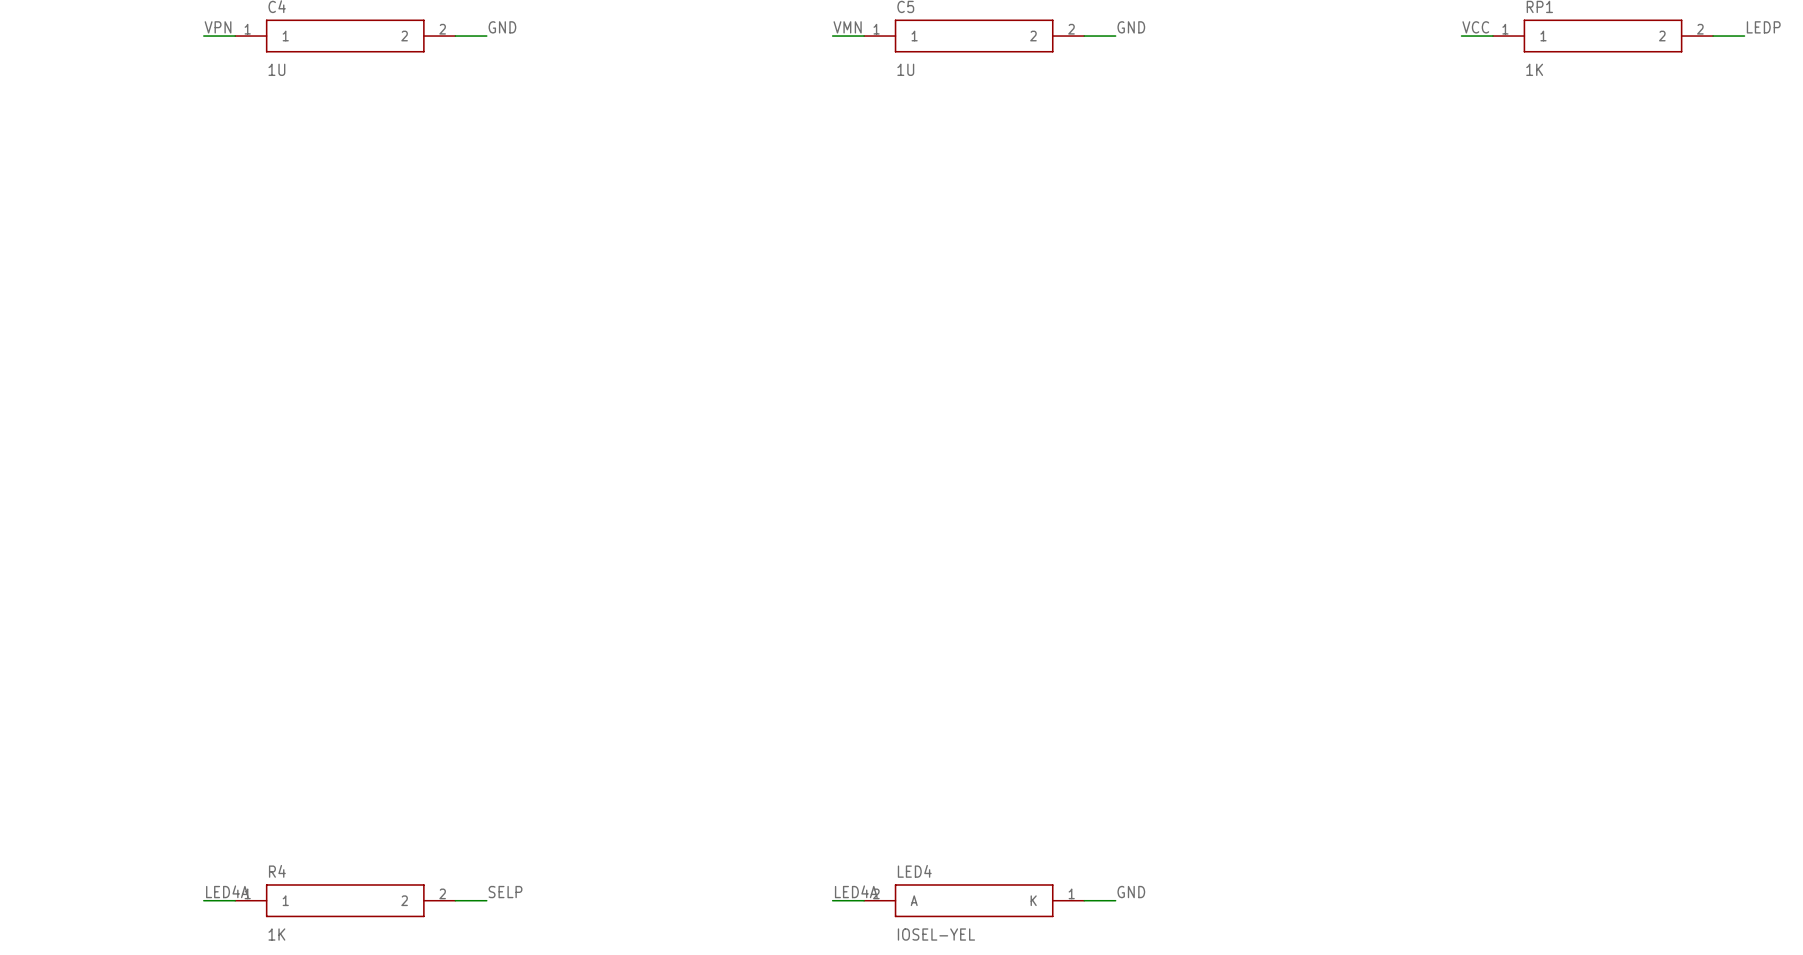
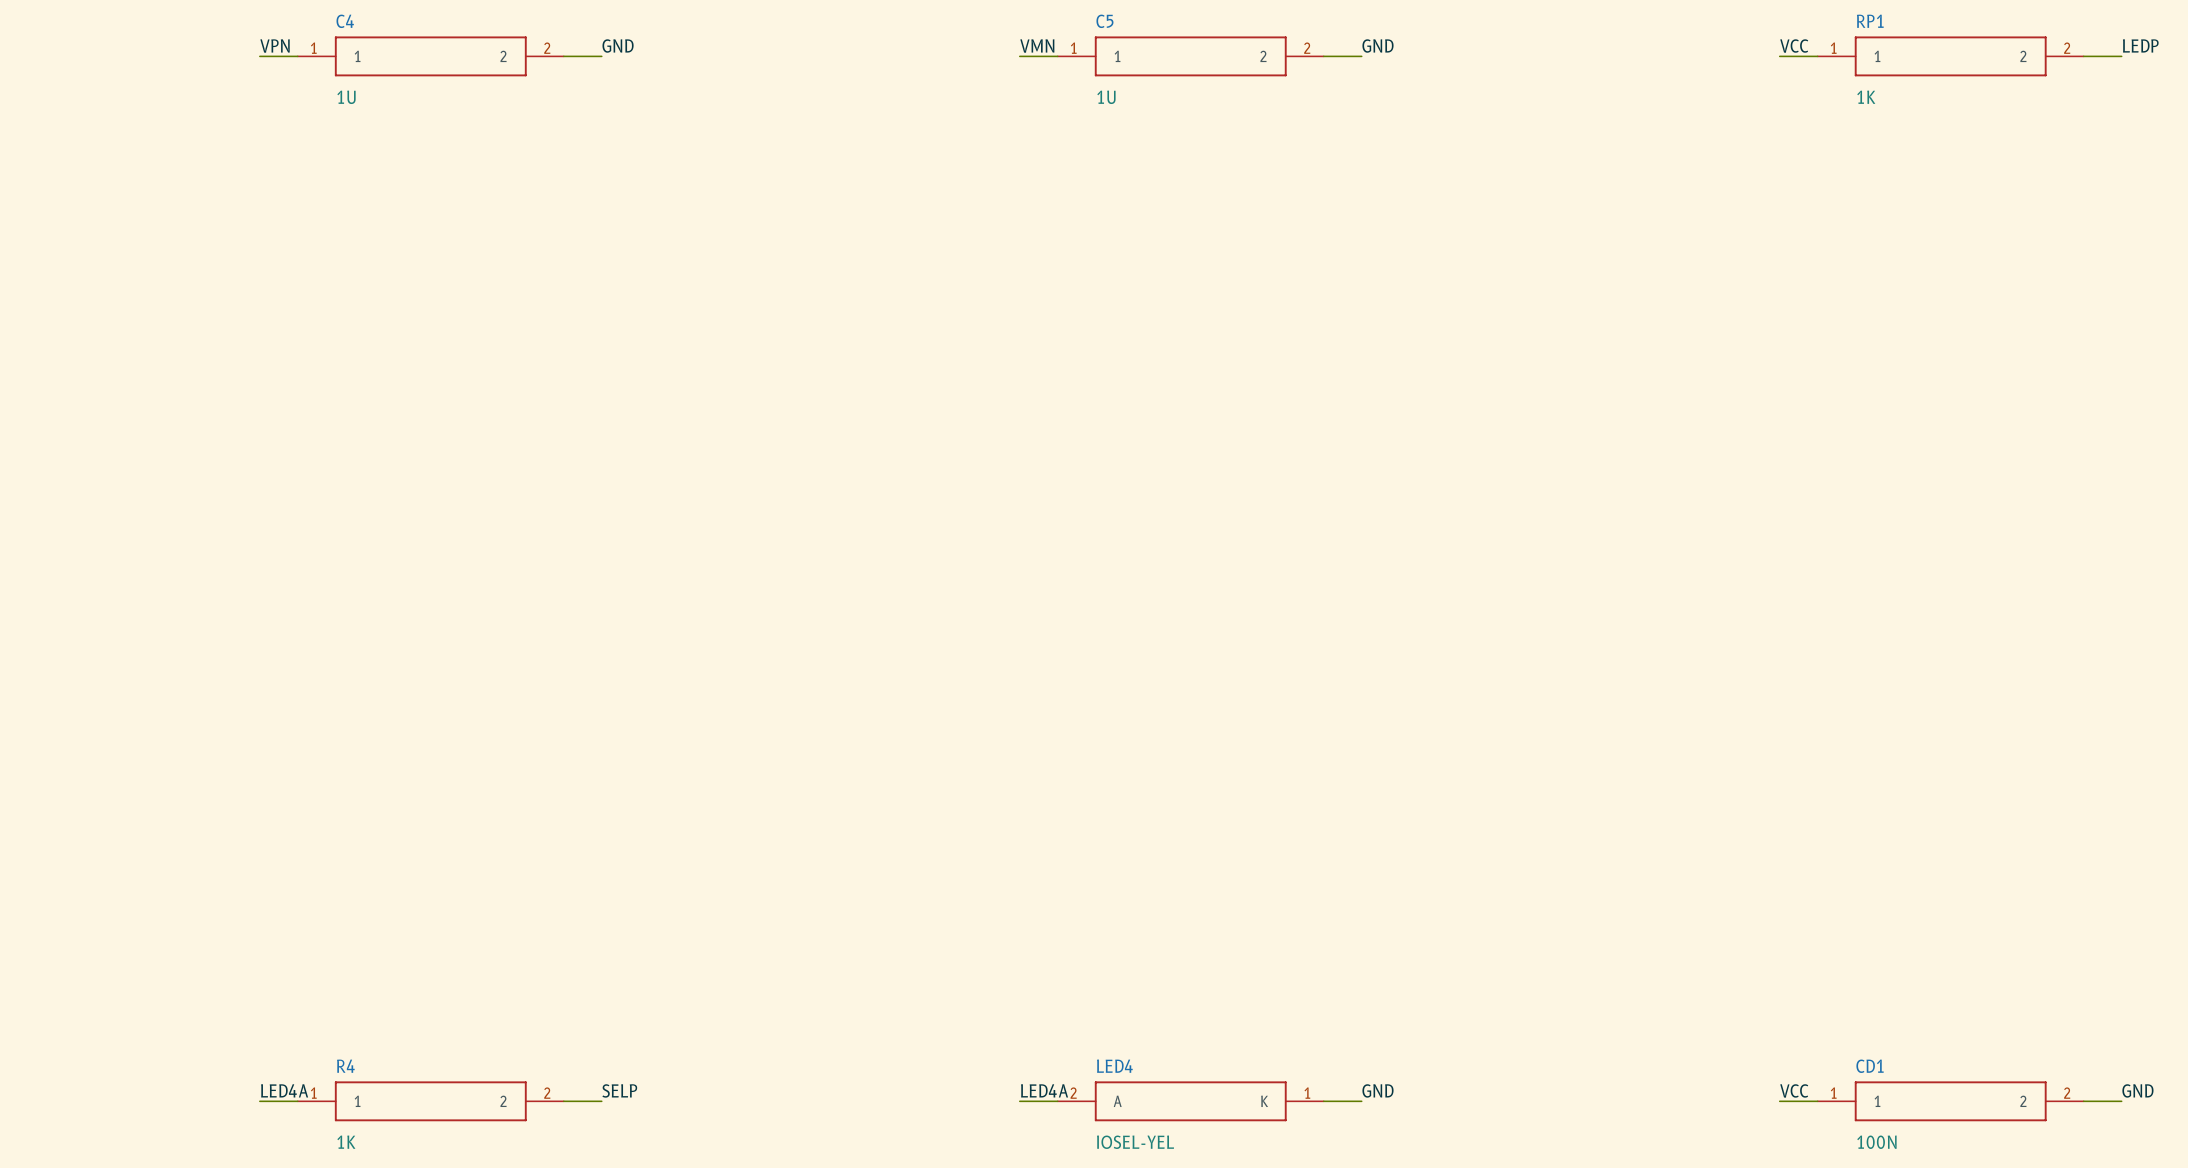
label: none -> VCC (1794, 1090)
label: none -> GND (2137, 1090)
wire: none -> (1779, 1101) (1817, 1101)
CD1: none -> 100N (1950, 1101)
wire: none -> (2083, 1101) (2121, 1101)

